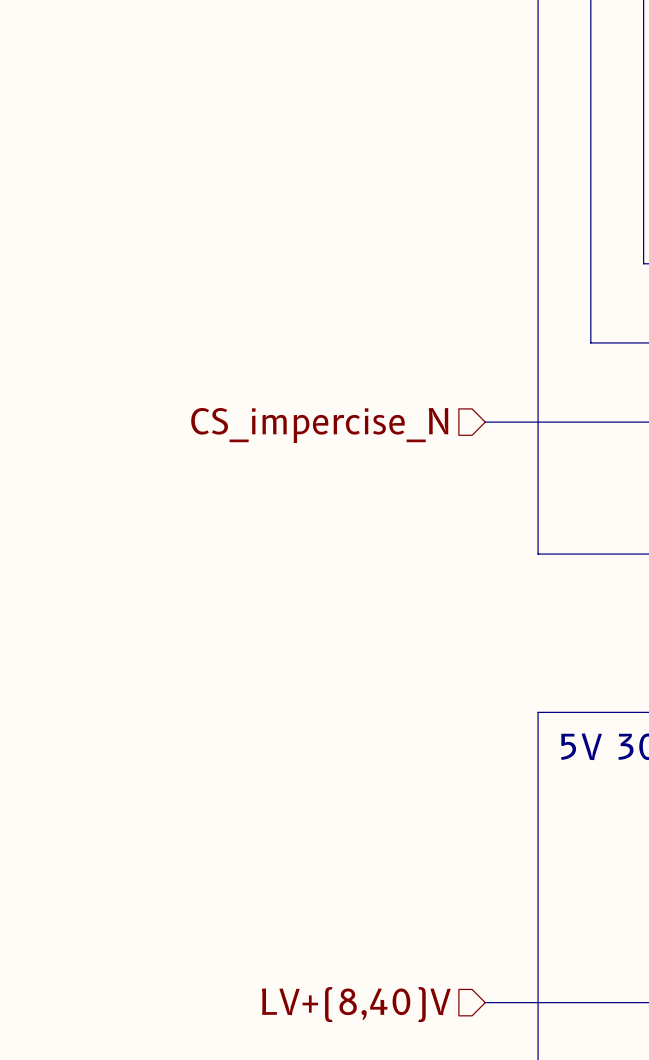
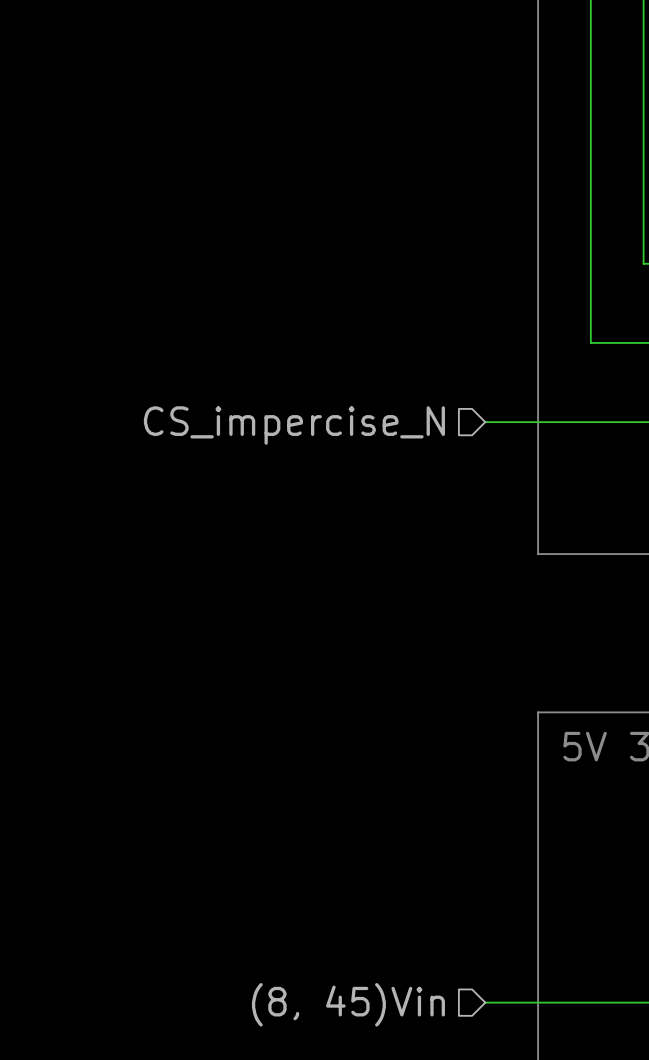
hierarchical label: LV+(8,40)V (356, 1004) -> (8, 45)Vin (348, 1004)

